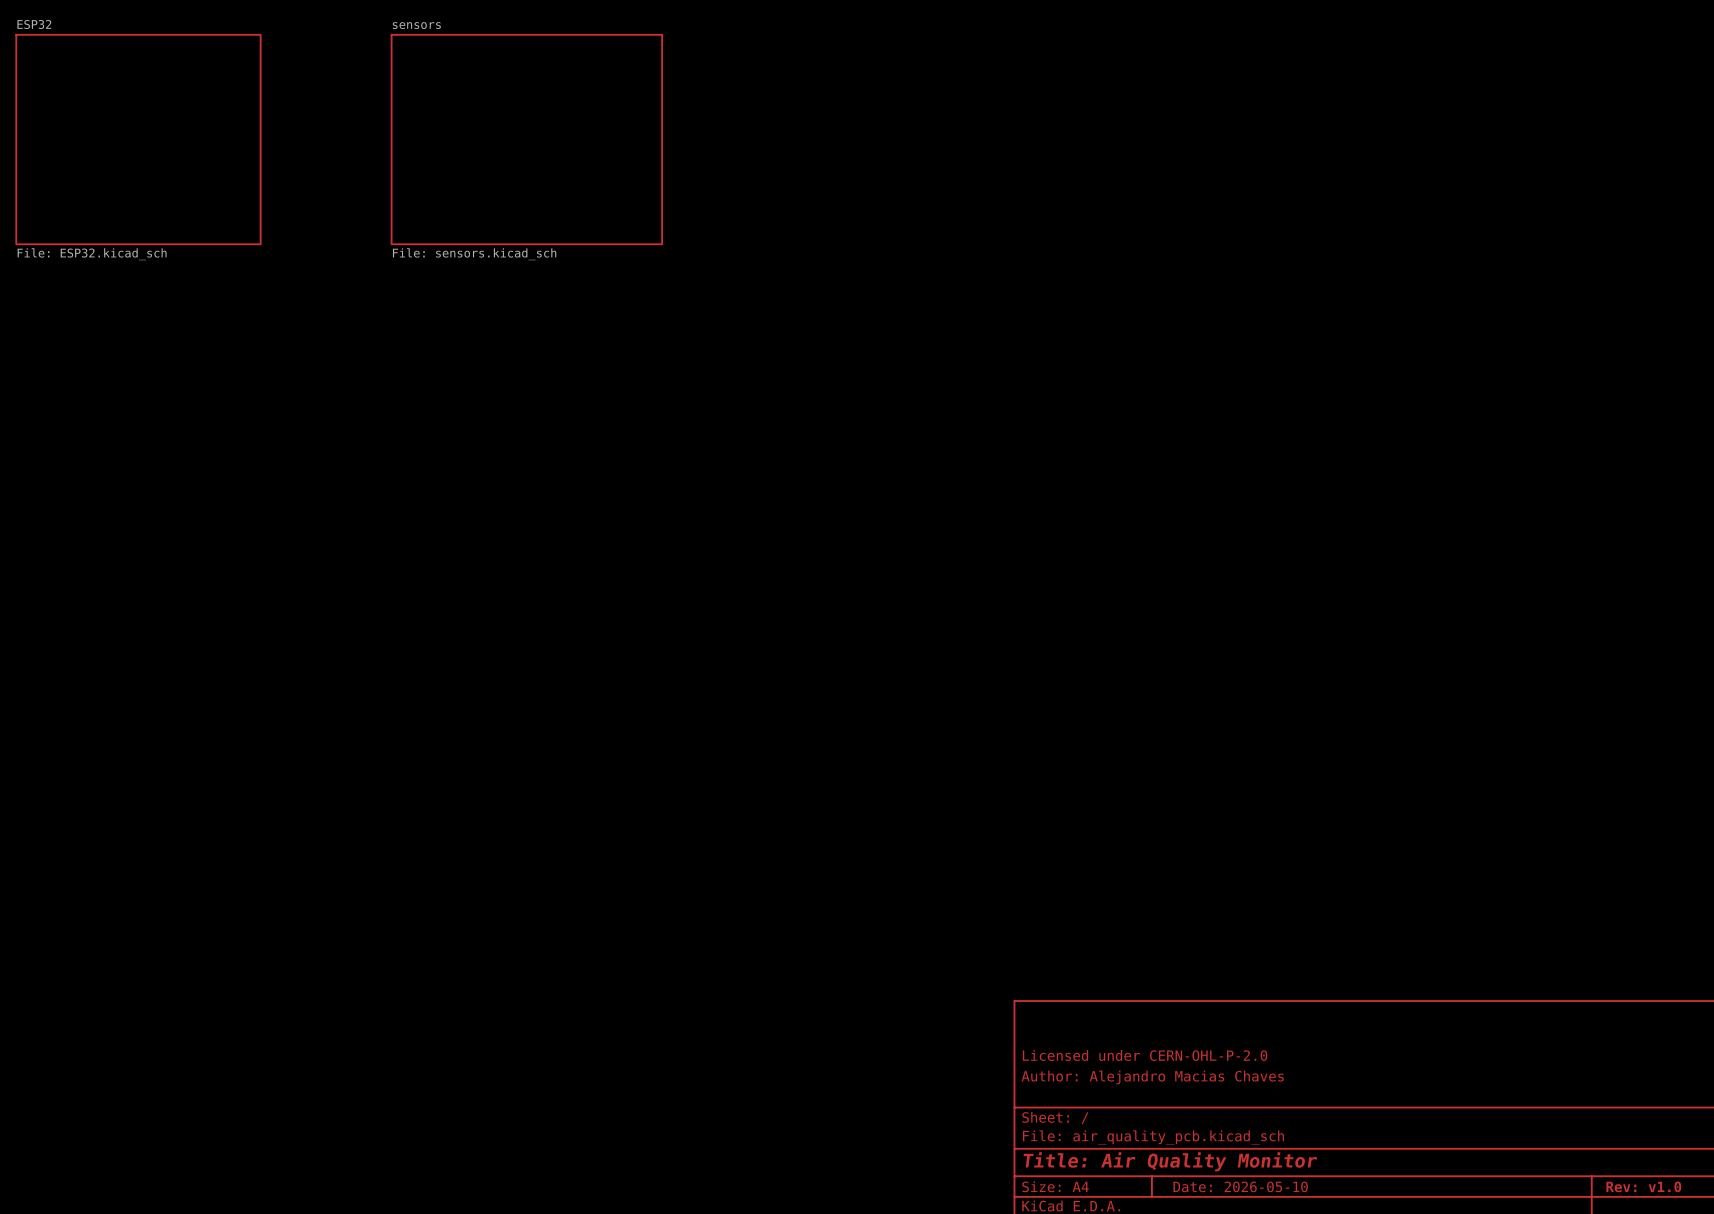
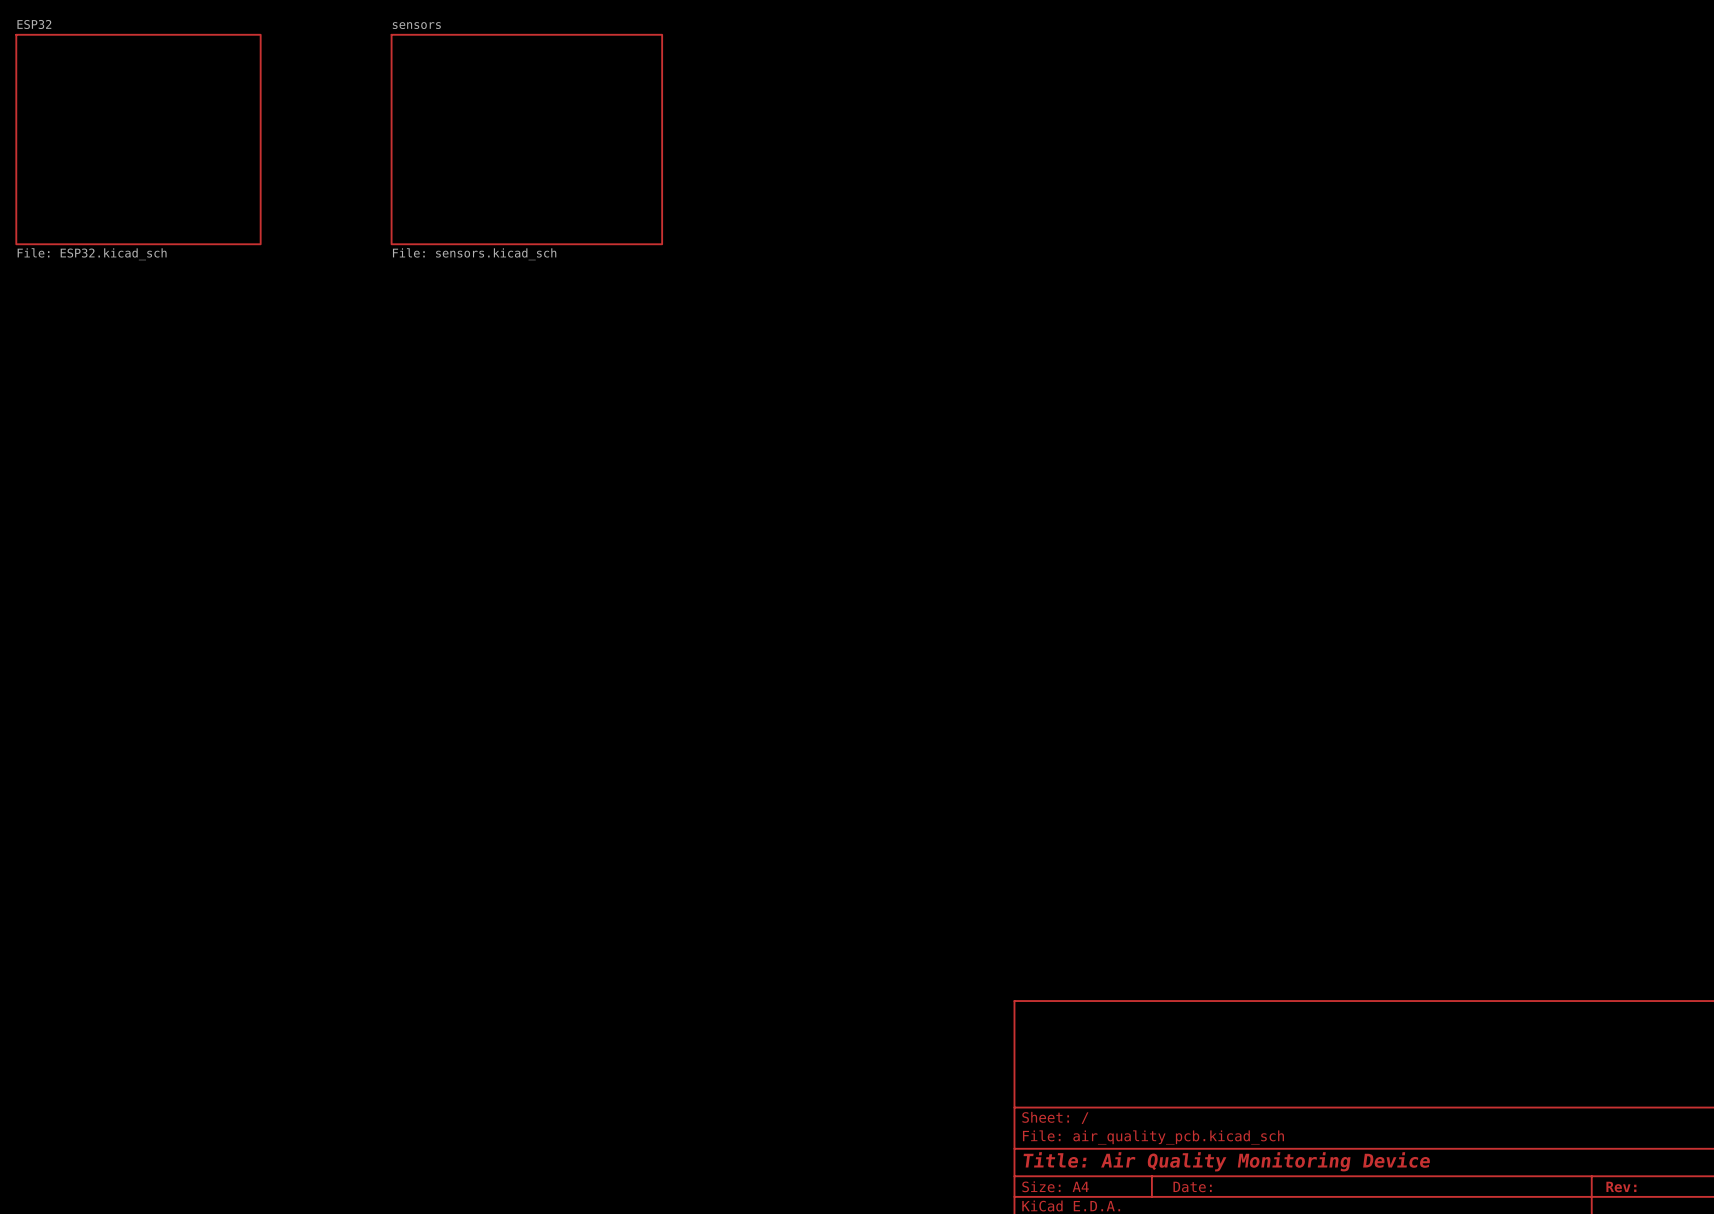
title block: Licensed under CERN-OHL-P-2.0 (1145, 1055) -> none
title block: Author: Alejandro Macias Chaves (1152, 1077) -> none
title block: Title: Air Quality Monitor (1170, 1161) -> Title: Air Quality Monitoring Device (1226, 1161)
title block: Date: 2026-05-10 (1240, 1186) -> Date: (1192, 1186)
title block: Rev: v1.0 (1643, 1186) -> Rev: (1621, 1186)

